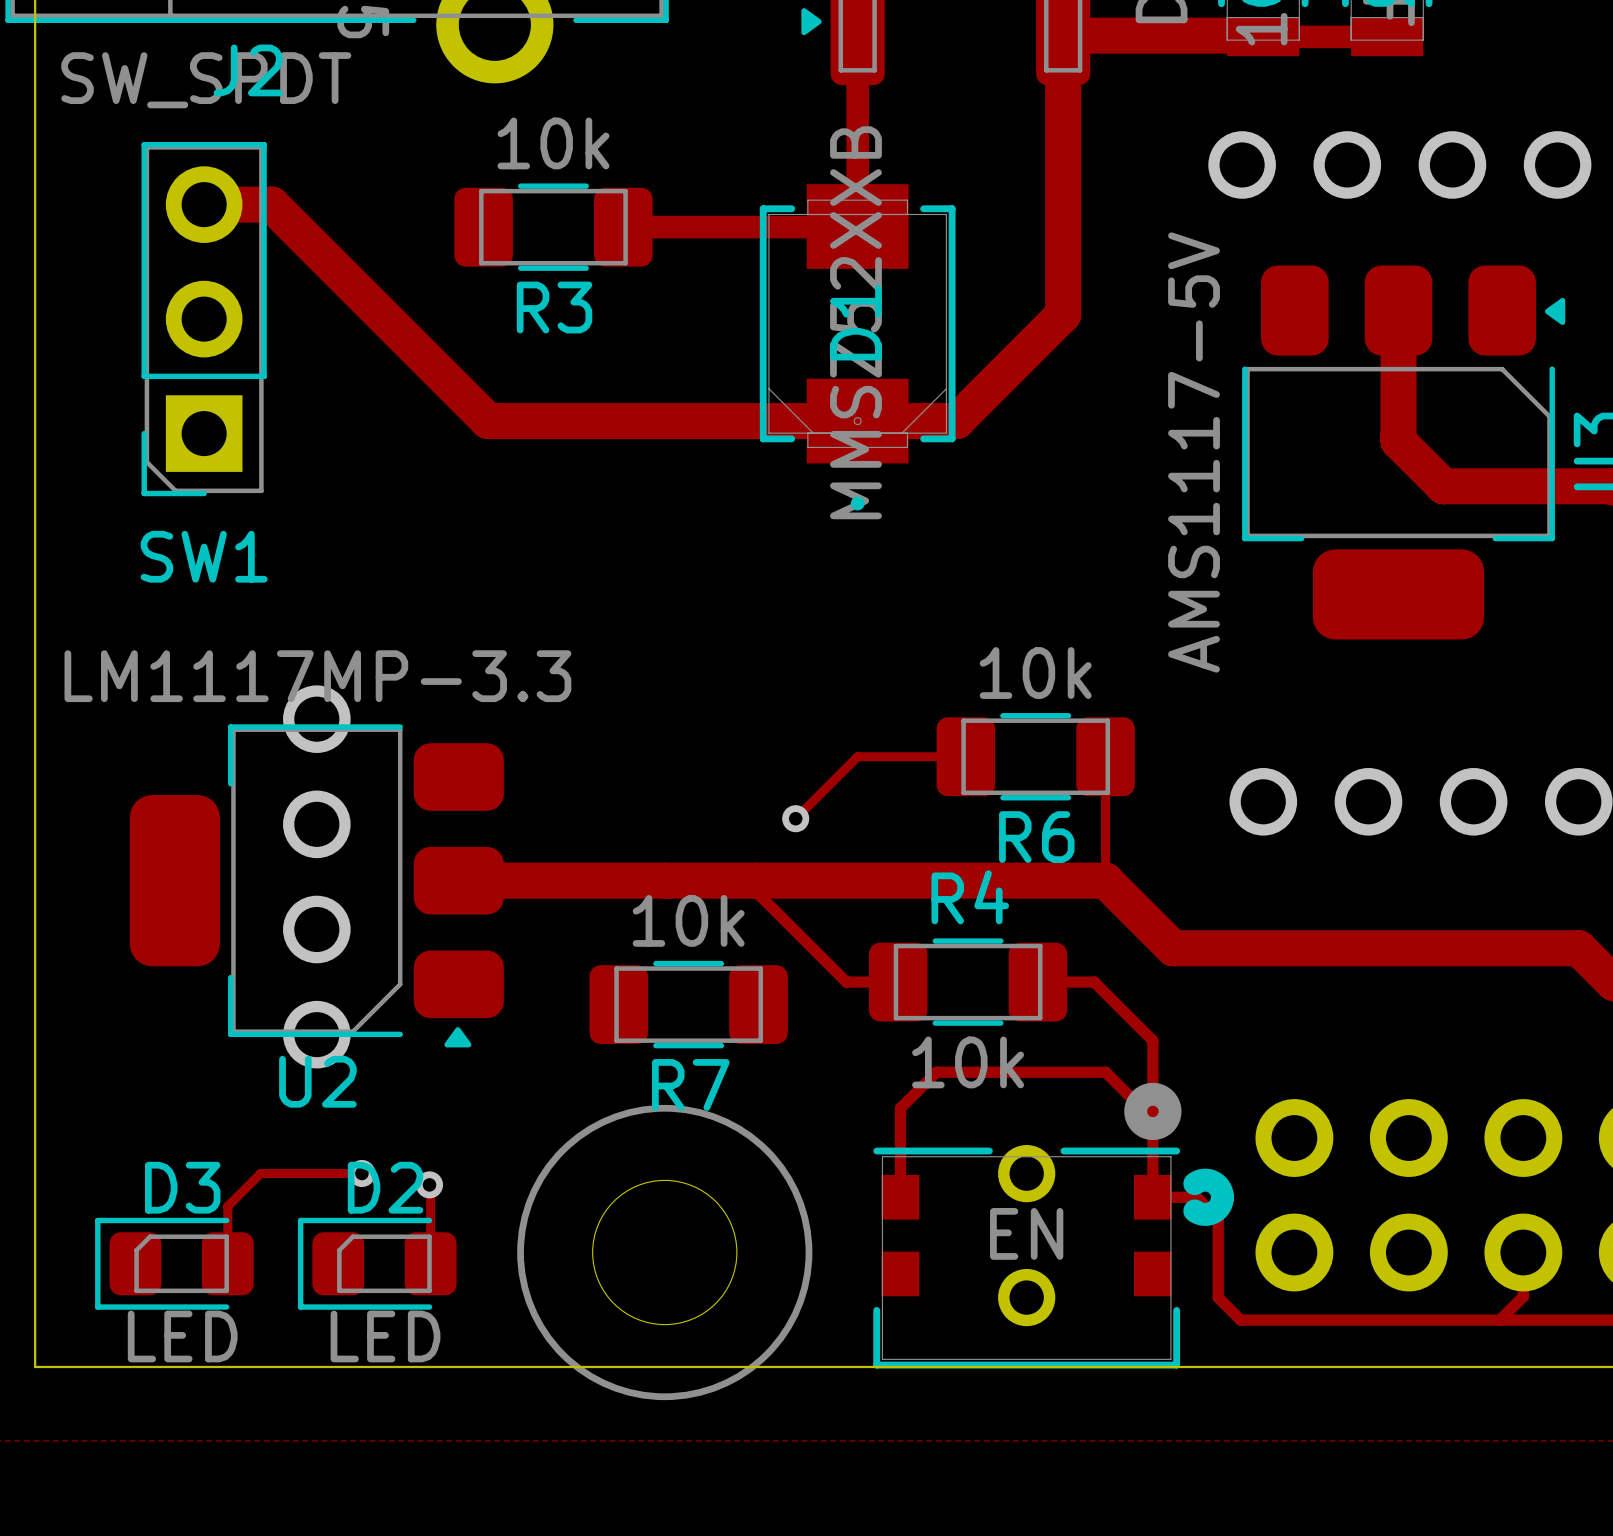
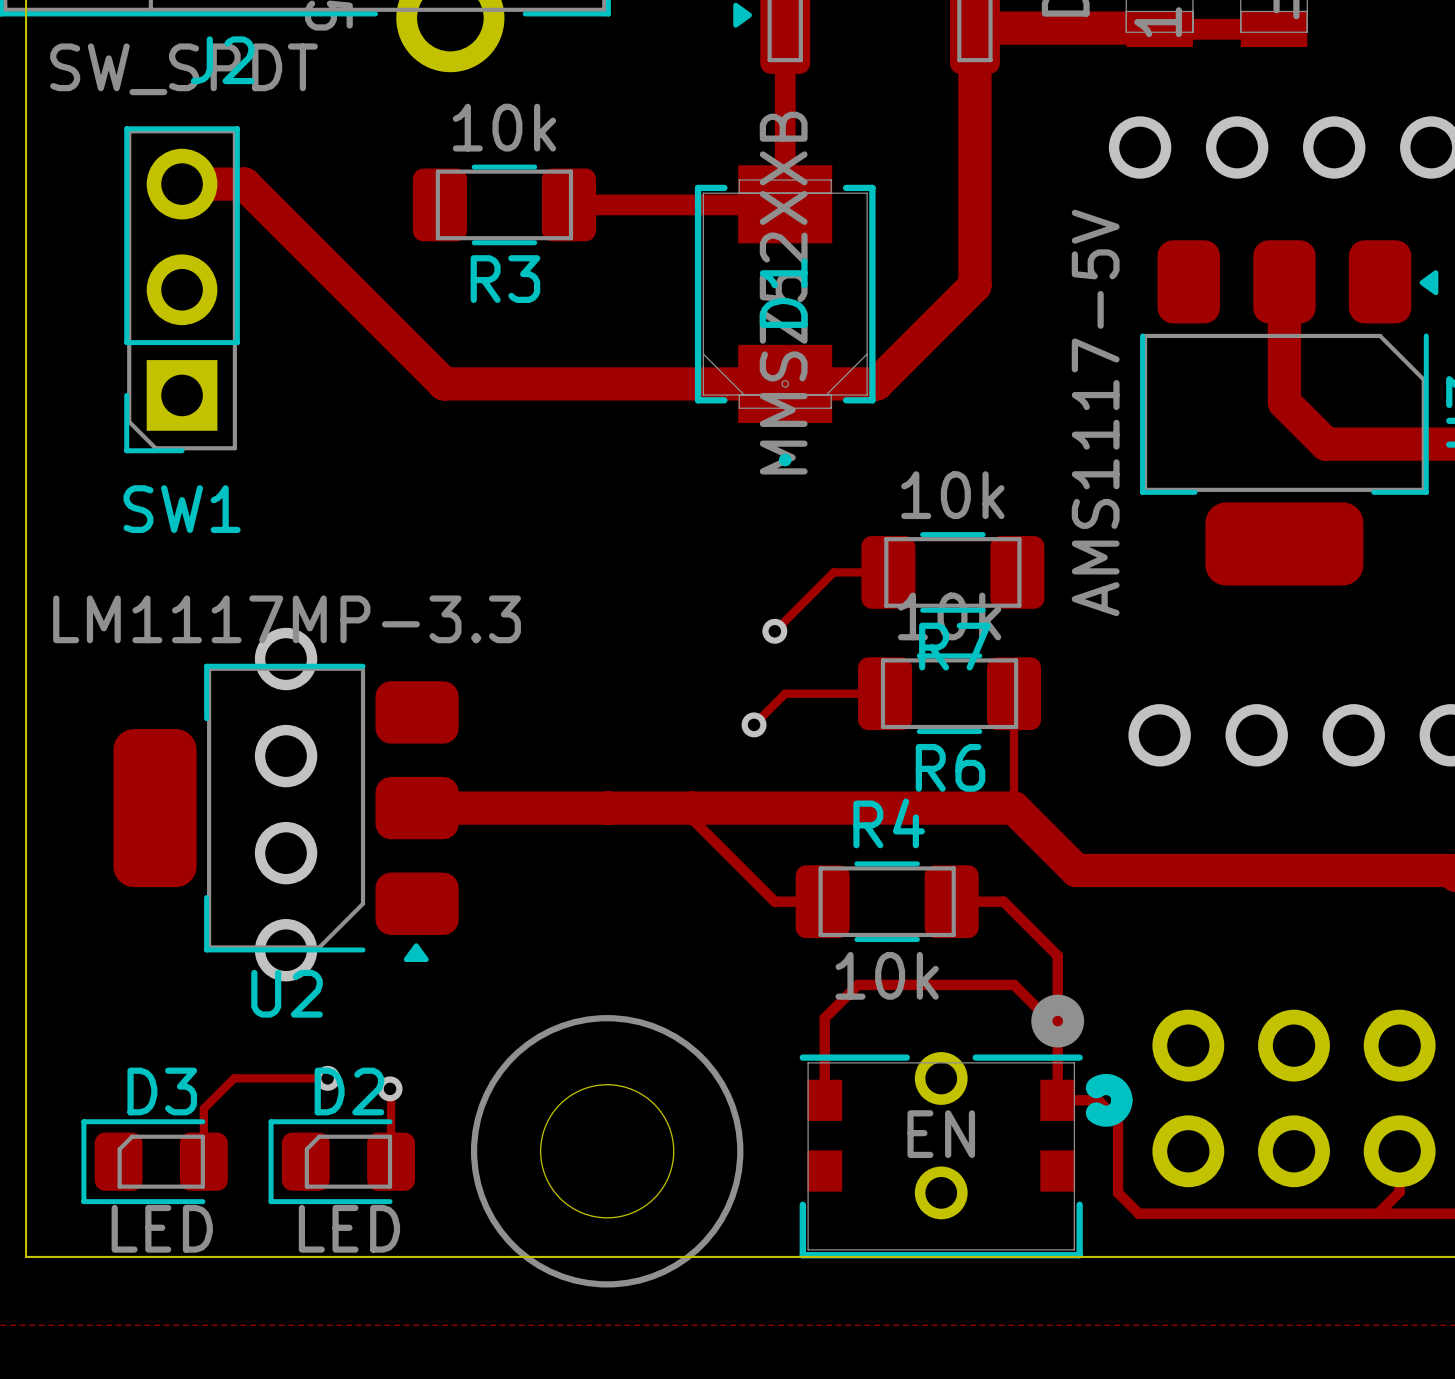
track: none -> (888, 572) (833, 572) (774, 631)
via: none -> (774, 631)
track: (823, 790) (795, 818) -> none
via position: (795, 818) -> (754, 724)
R7 position: (688, 1004) -> (952, 572)

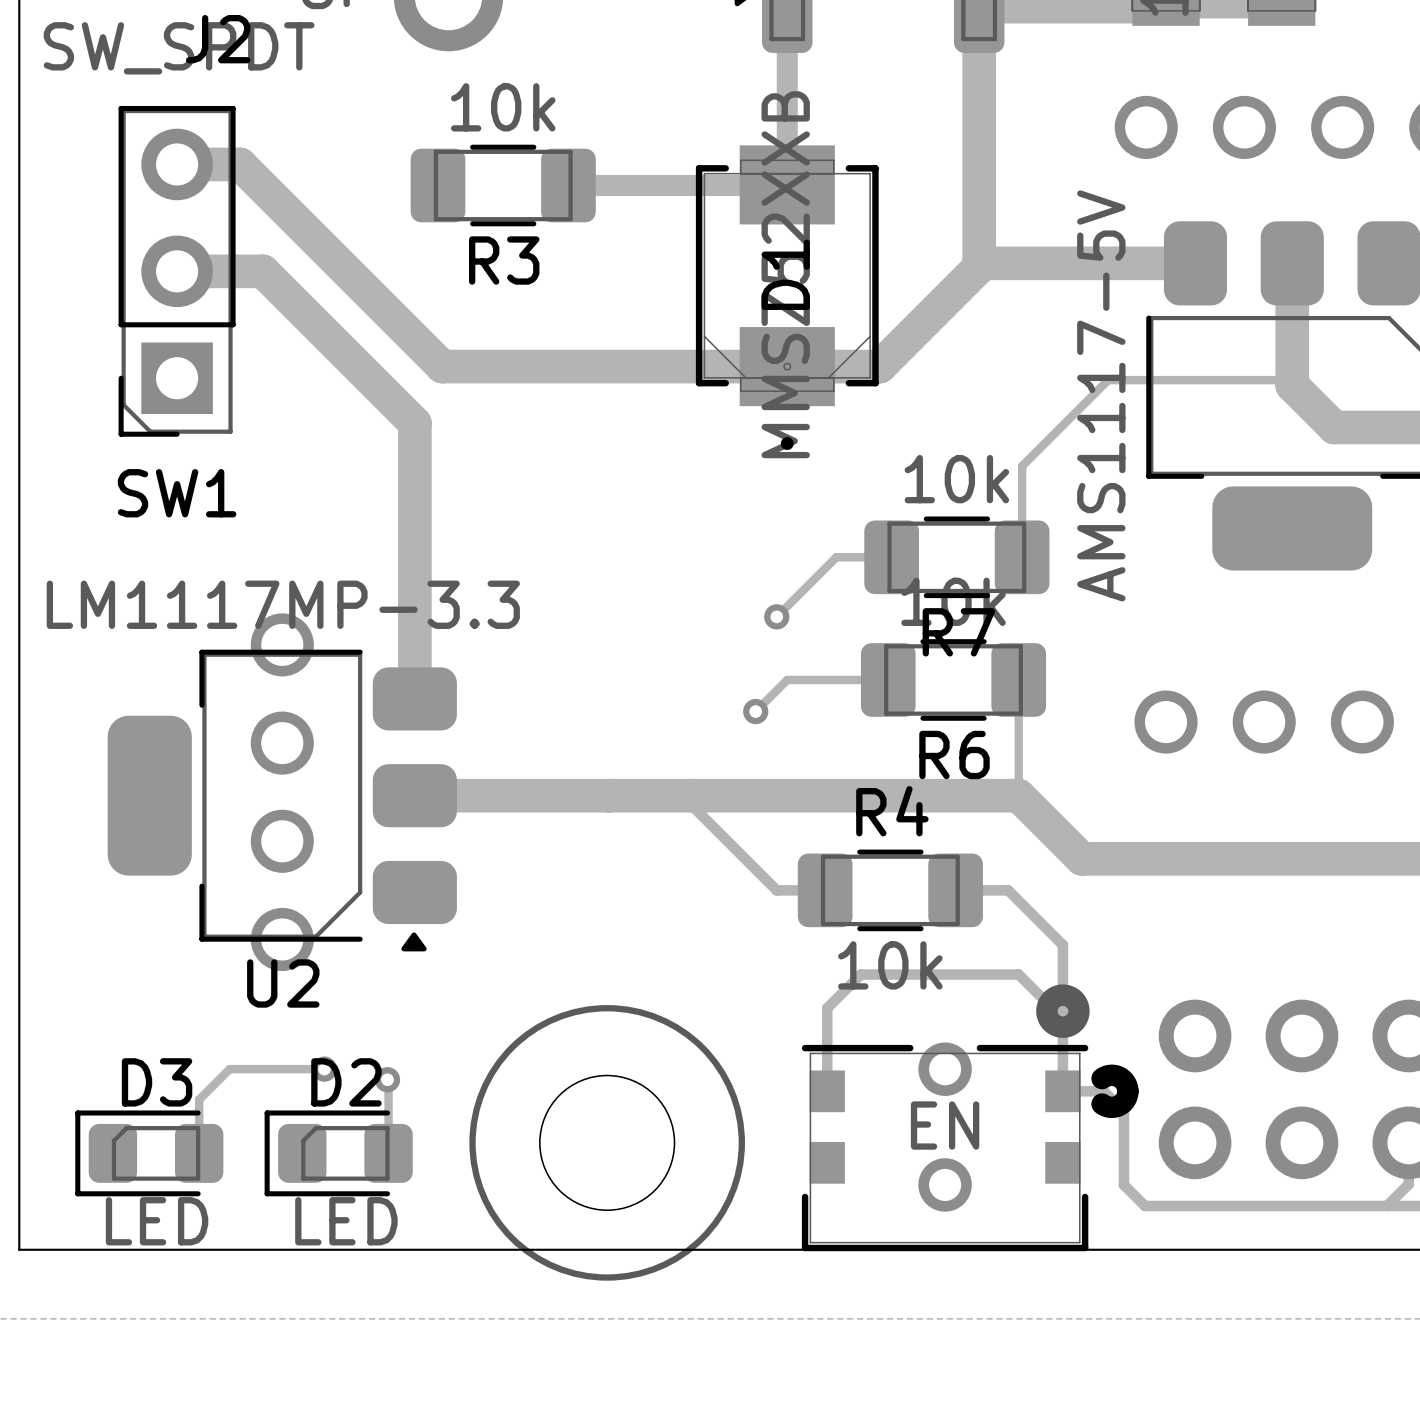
track: none -> (1195, 263) (982, 263) (979, 267)
track: none -> (177, 271) (262, 271) (414, 423) (414, 698)
track: none -> (1292, 380) (1108, 380) (1022, 466) (1022, 557)

